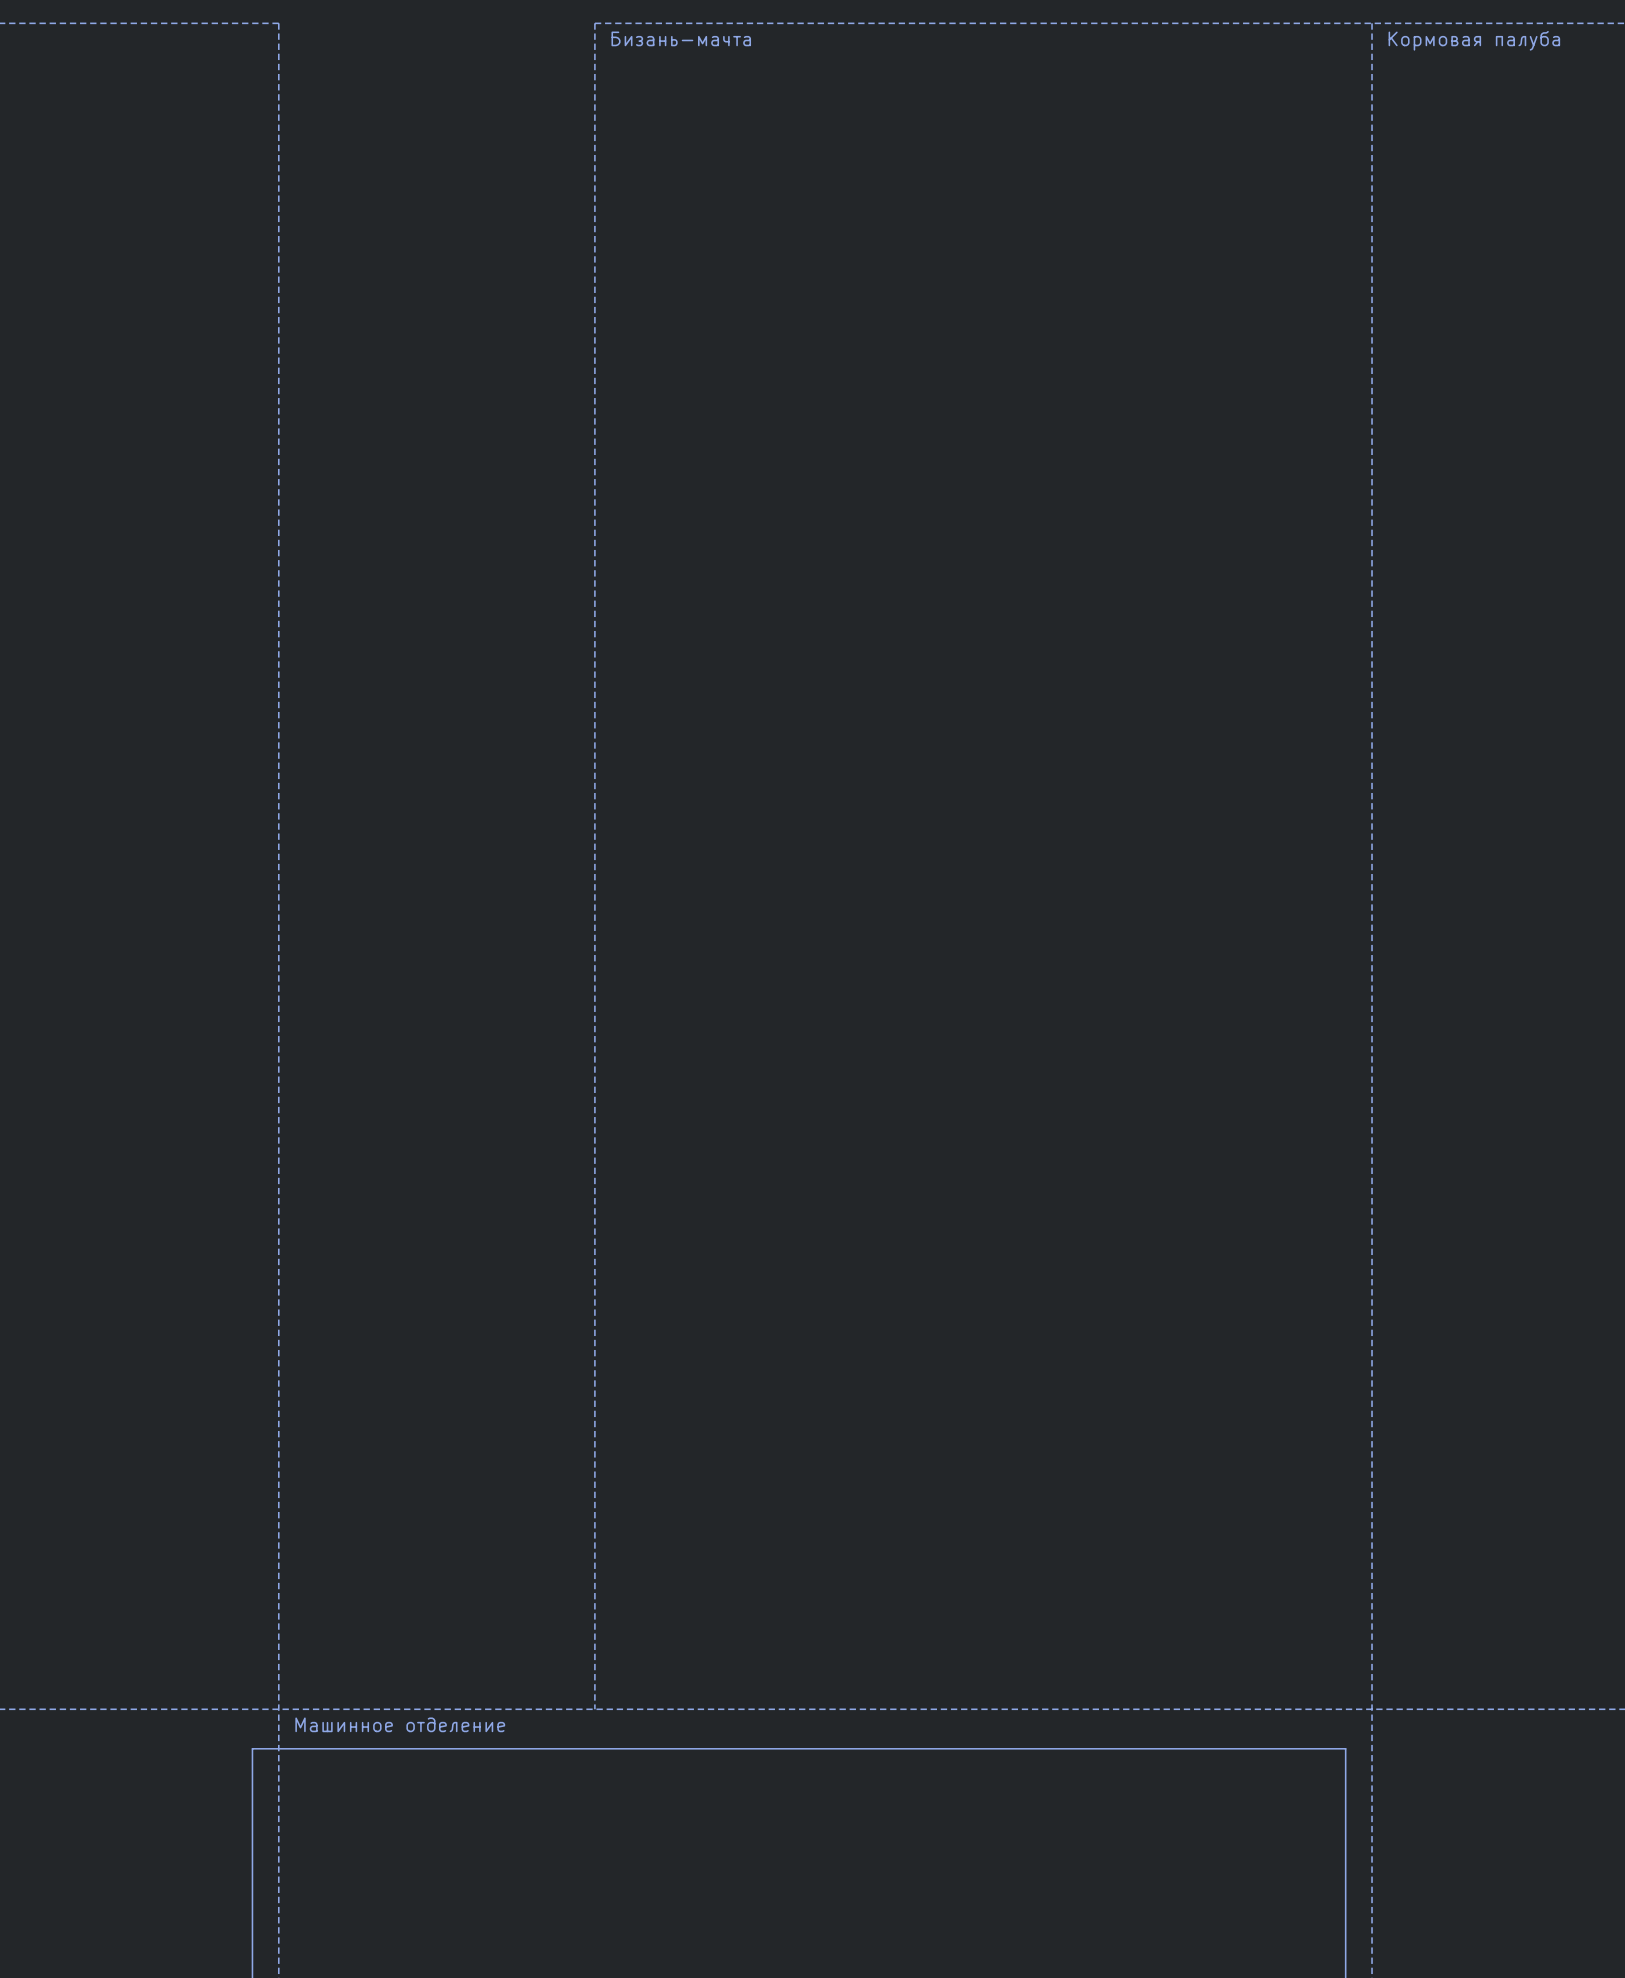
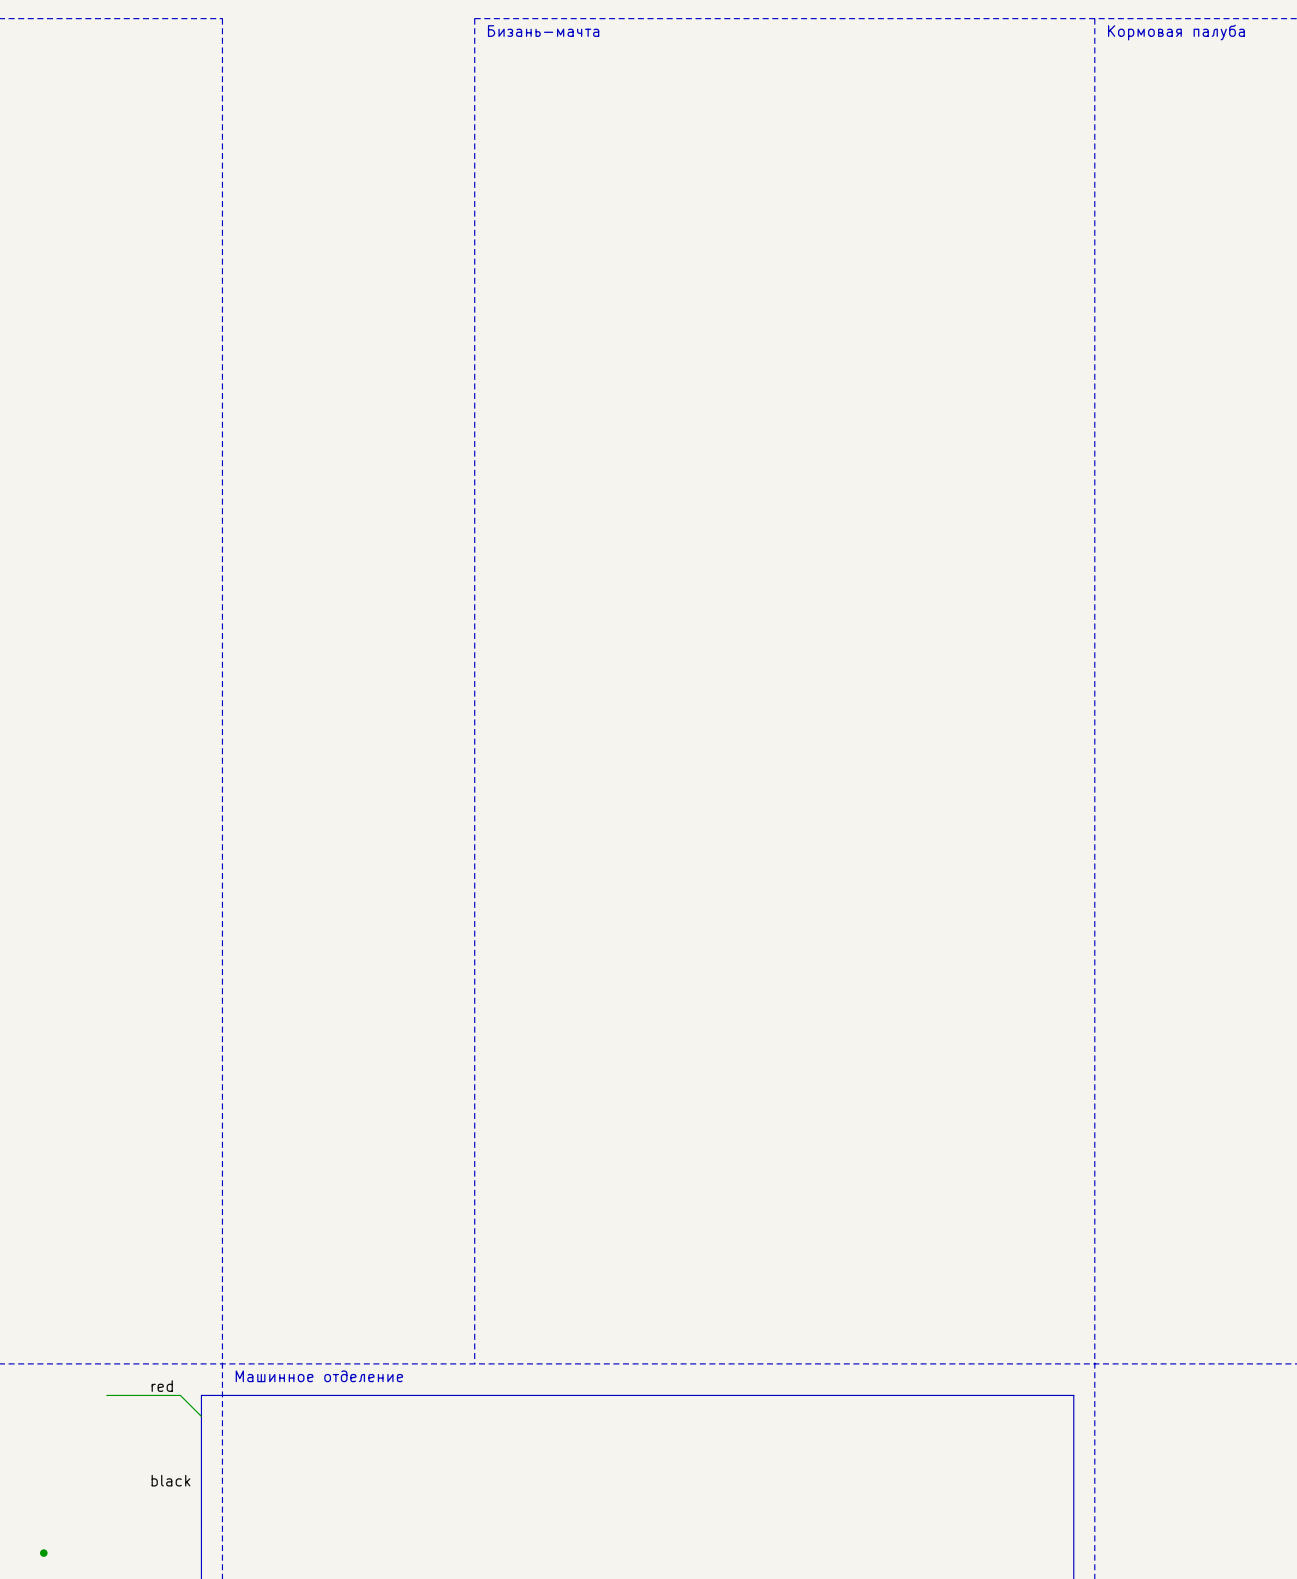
label: none -> red (162, 1386)
wire: none -> (106, 1395) (180, 1395) (201, 1416)
label: none -> black (170, 1480)
junction: none -> (43, 1553)

